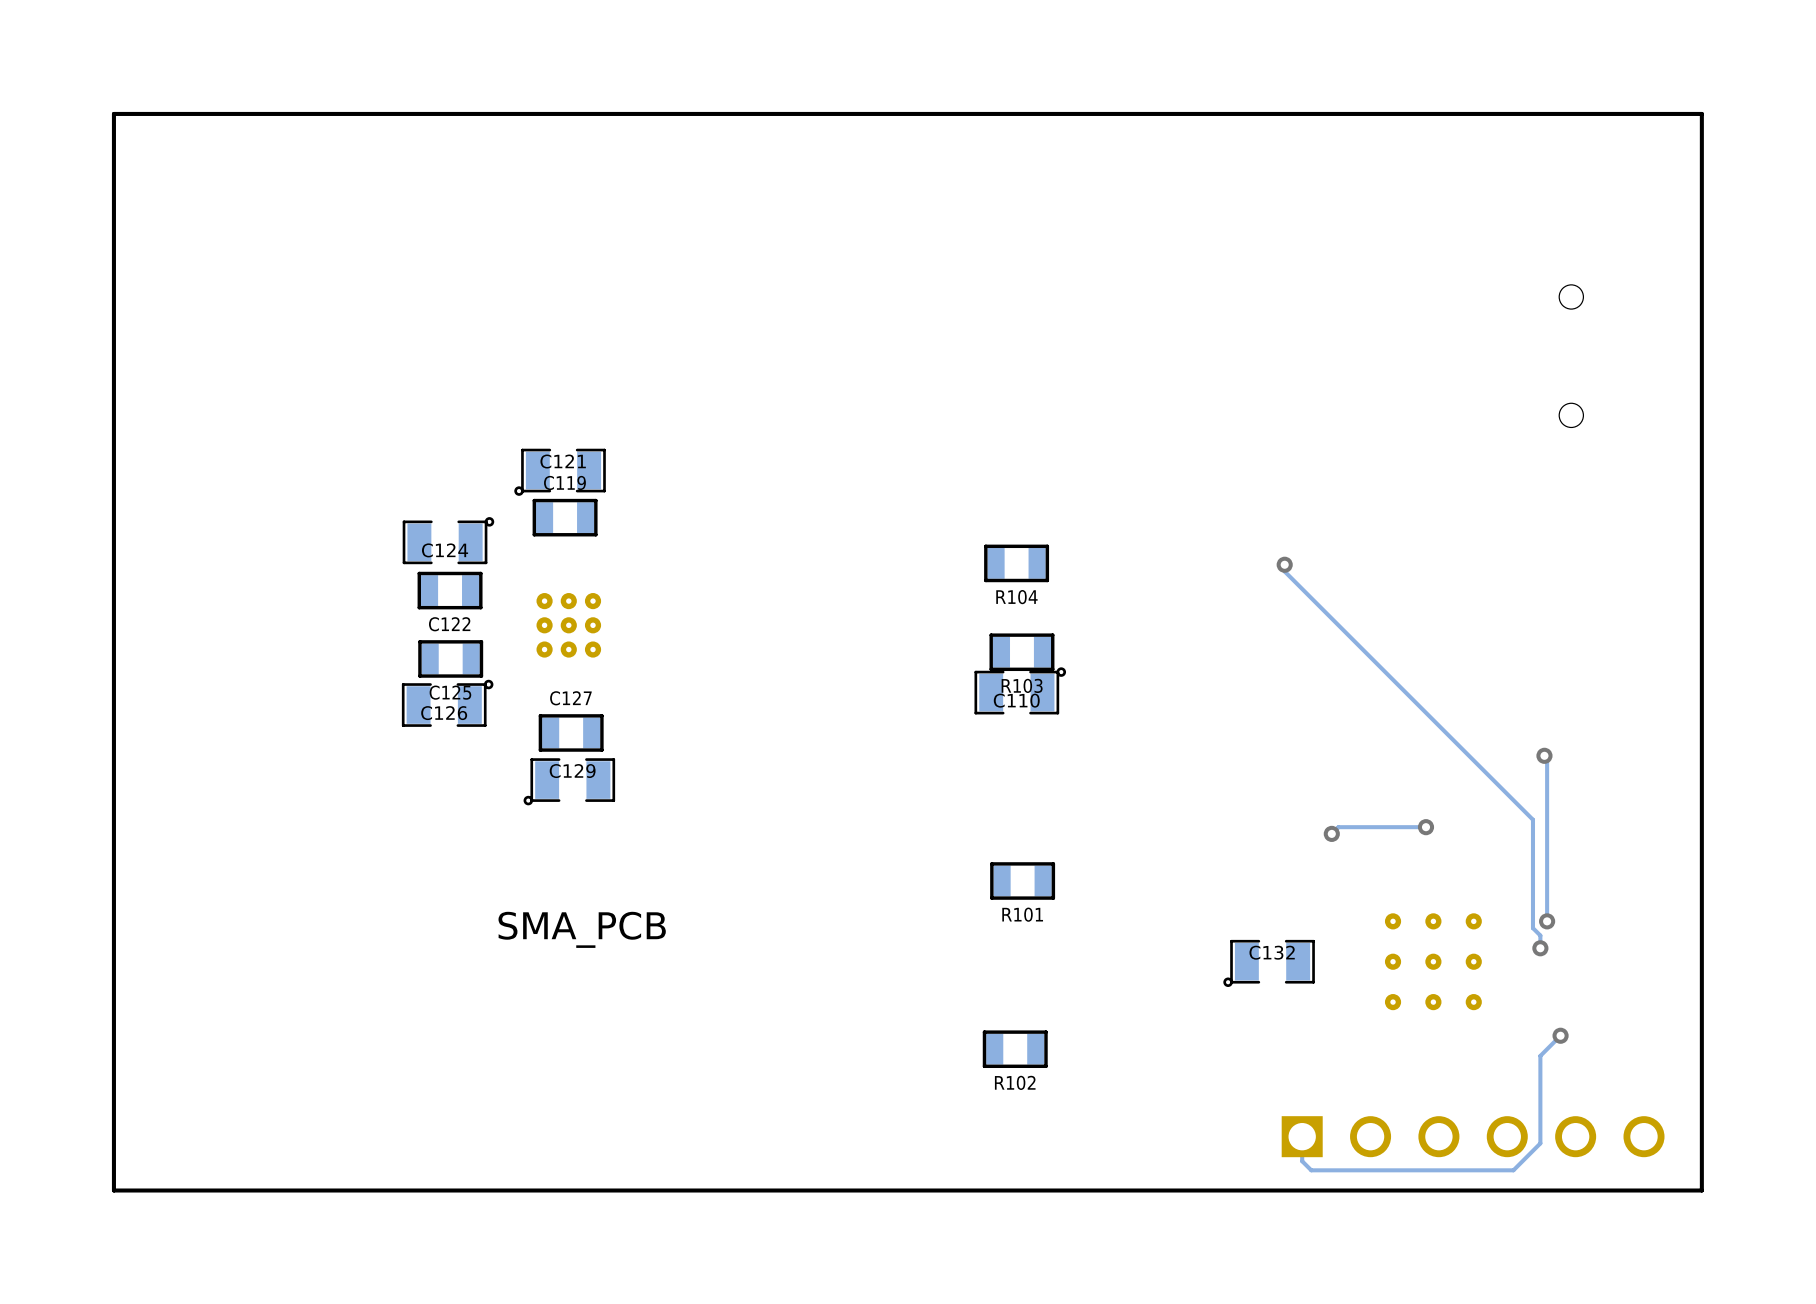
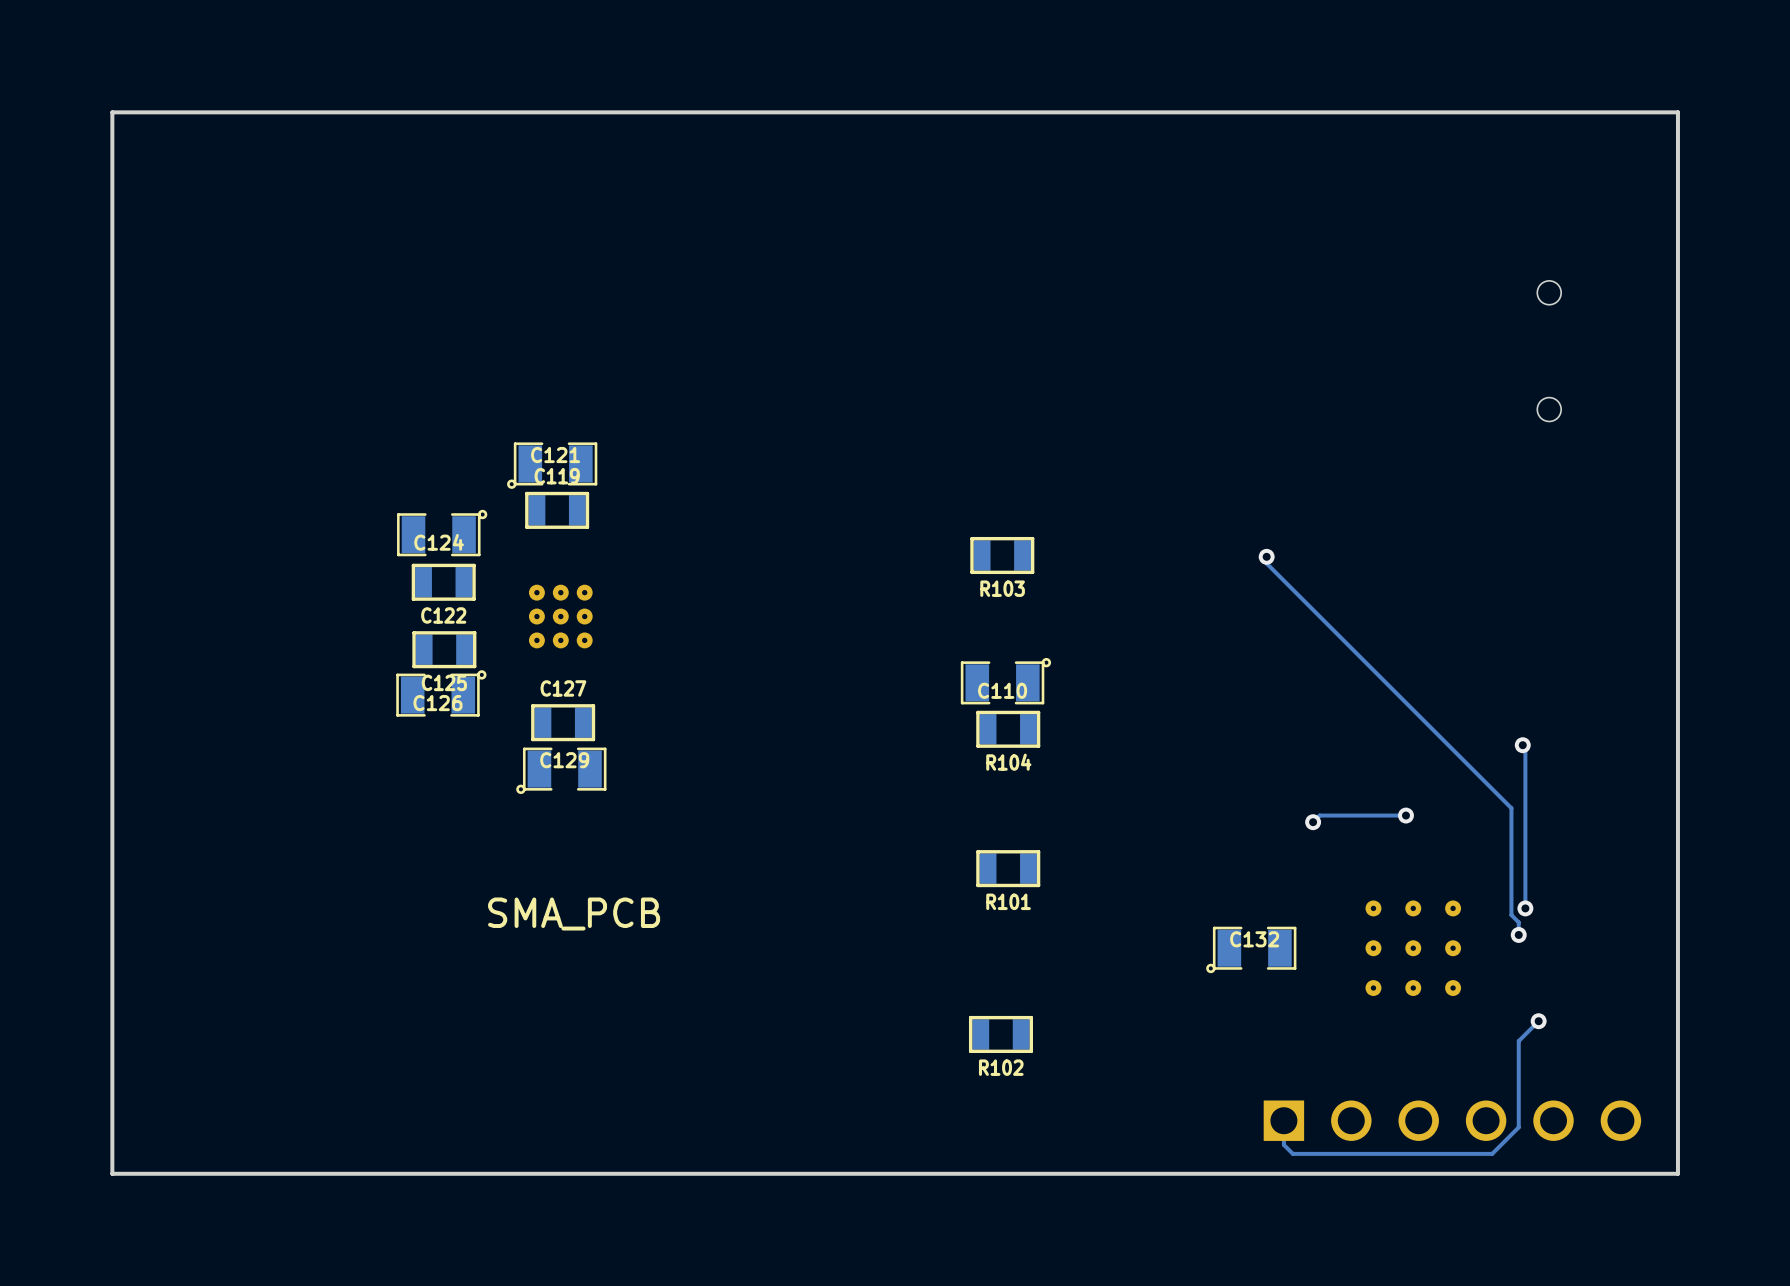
R104 name: R104 (1016, 597) -> R103 (1002, 588)
R103: (1021, 652) -> none
R104: none -> (1008, 729)

